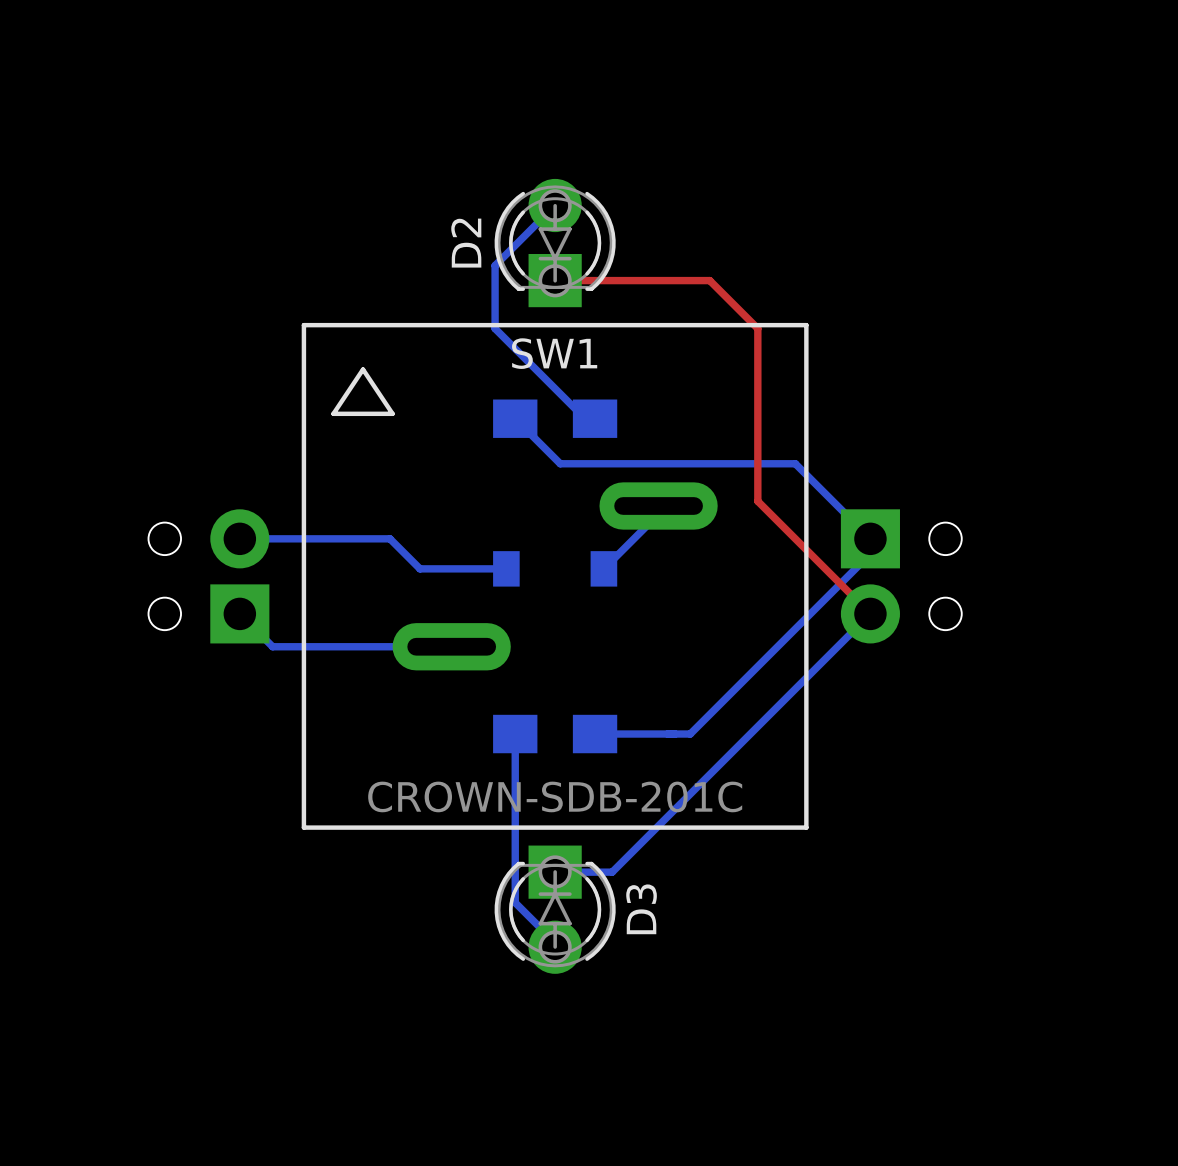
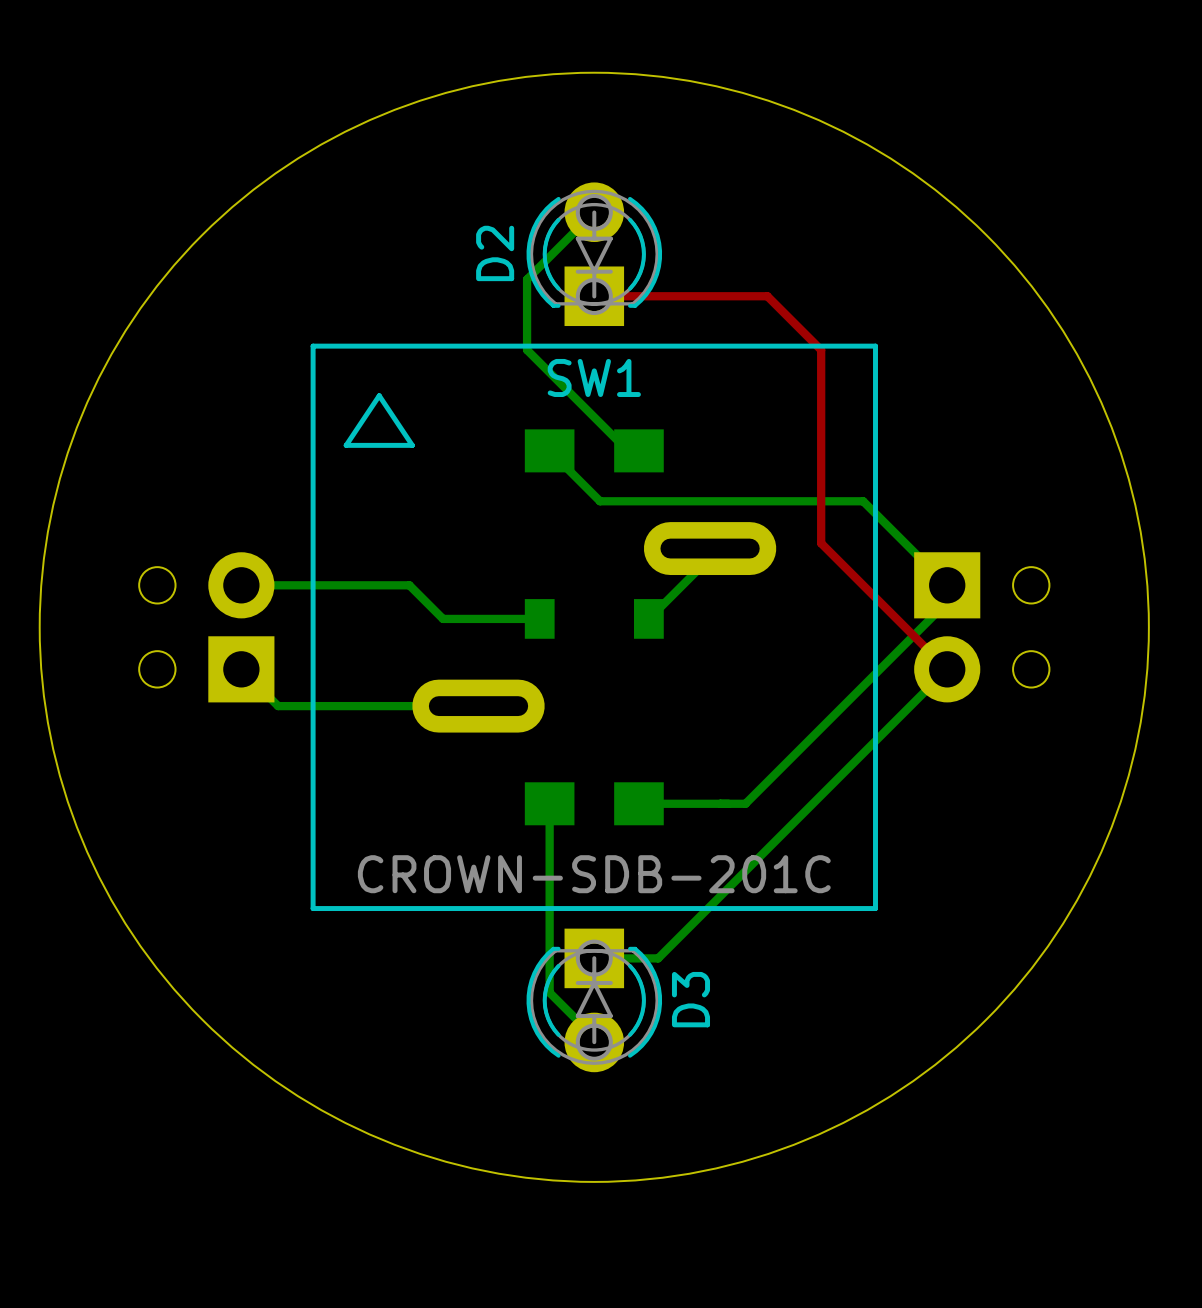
round board edge: none -> [38, 71, 1150, 1183]

